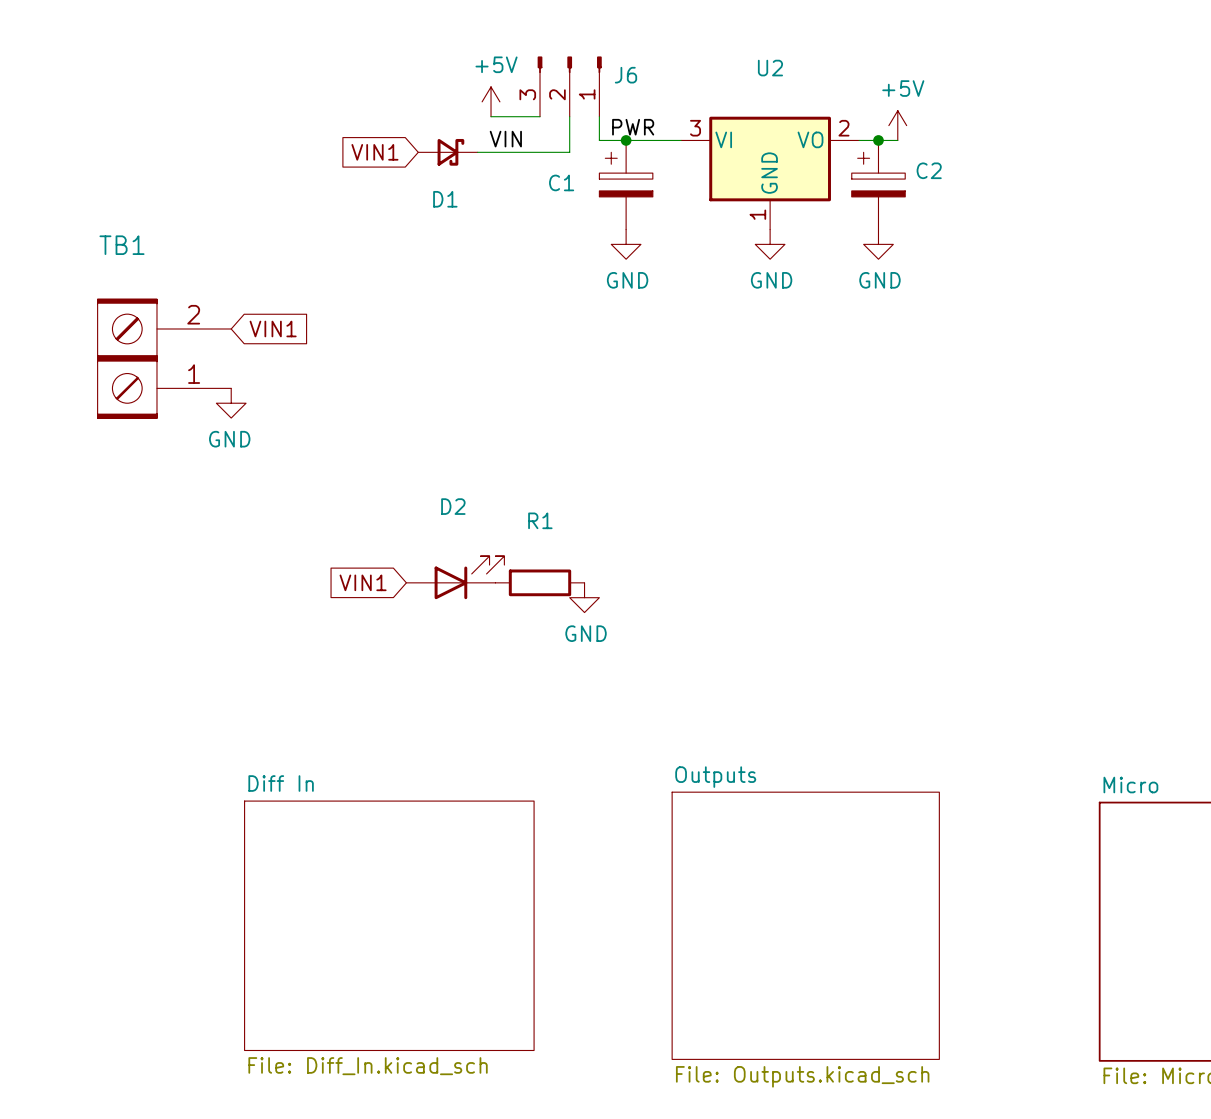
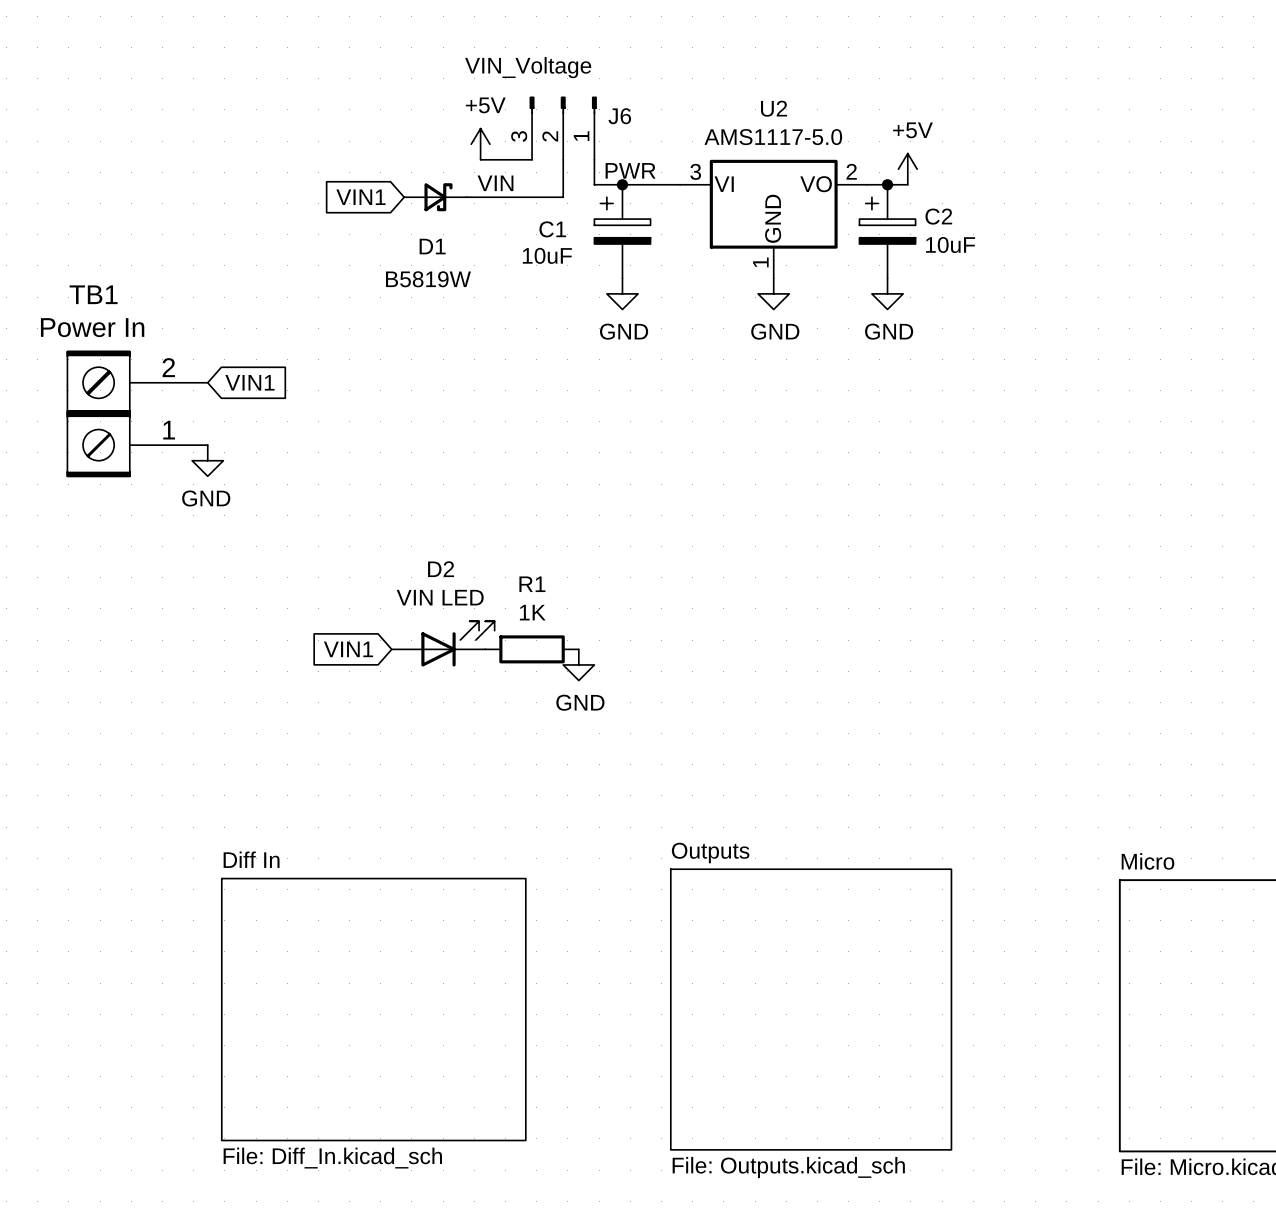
J6 value: none -> VIN_Voltage (528, 67)
U2 value: none -> AMS1117-5.0 (773, 137)
C2 value: none -> 10uF (950, 244)
C1 value: none -> 10uF (547, 255)
D1 value: none -> B5819W (428, 279)
TB1 value: none -> Power In (92, 327)
D2 value: none -> VIN LED (440, 597)
R1 value: none -> 1K (532, 612)

